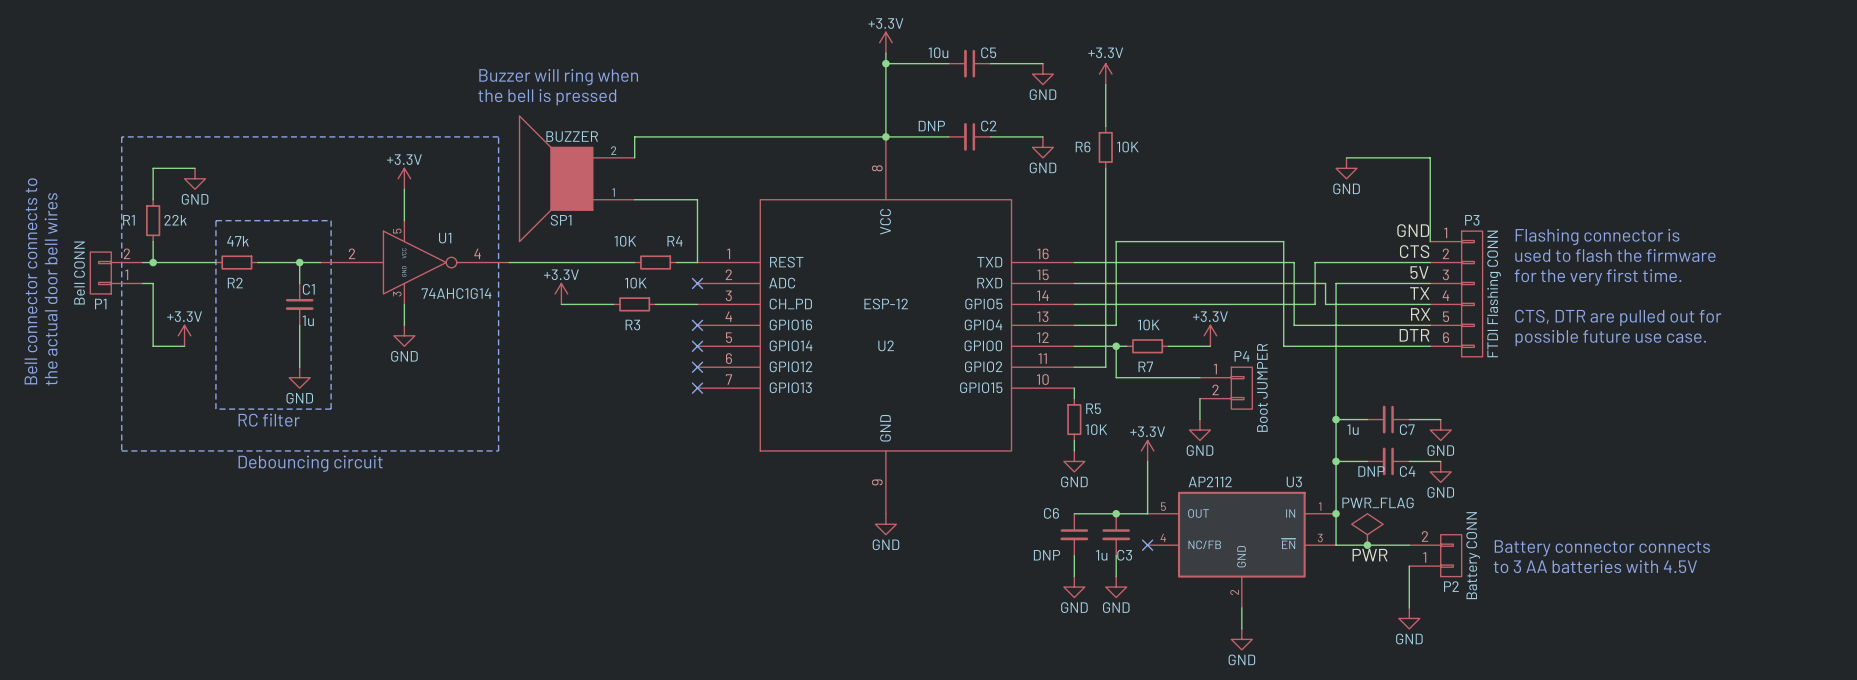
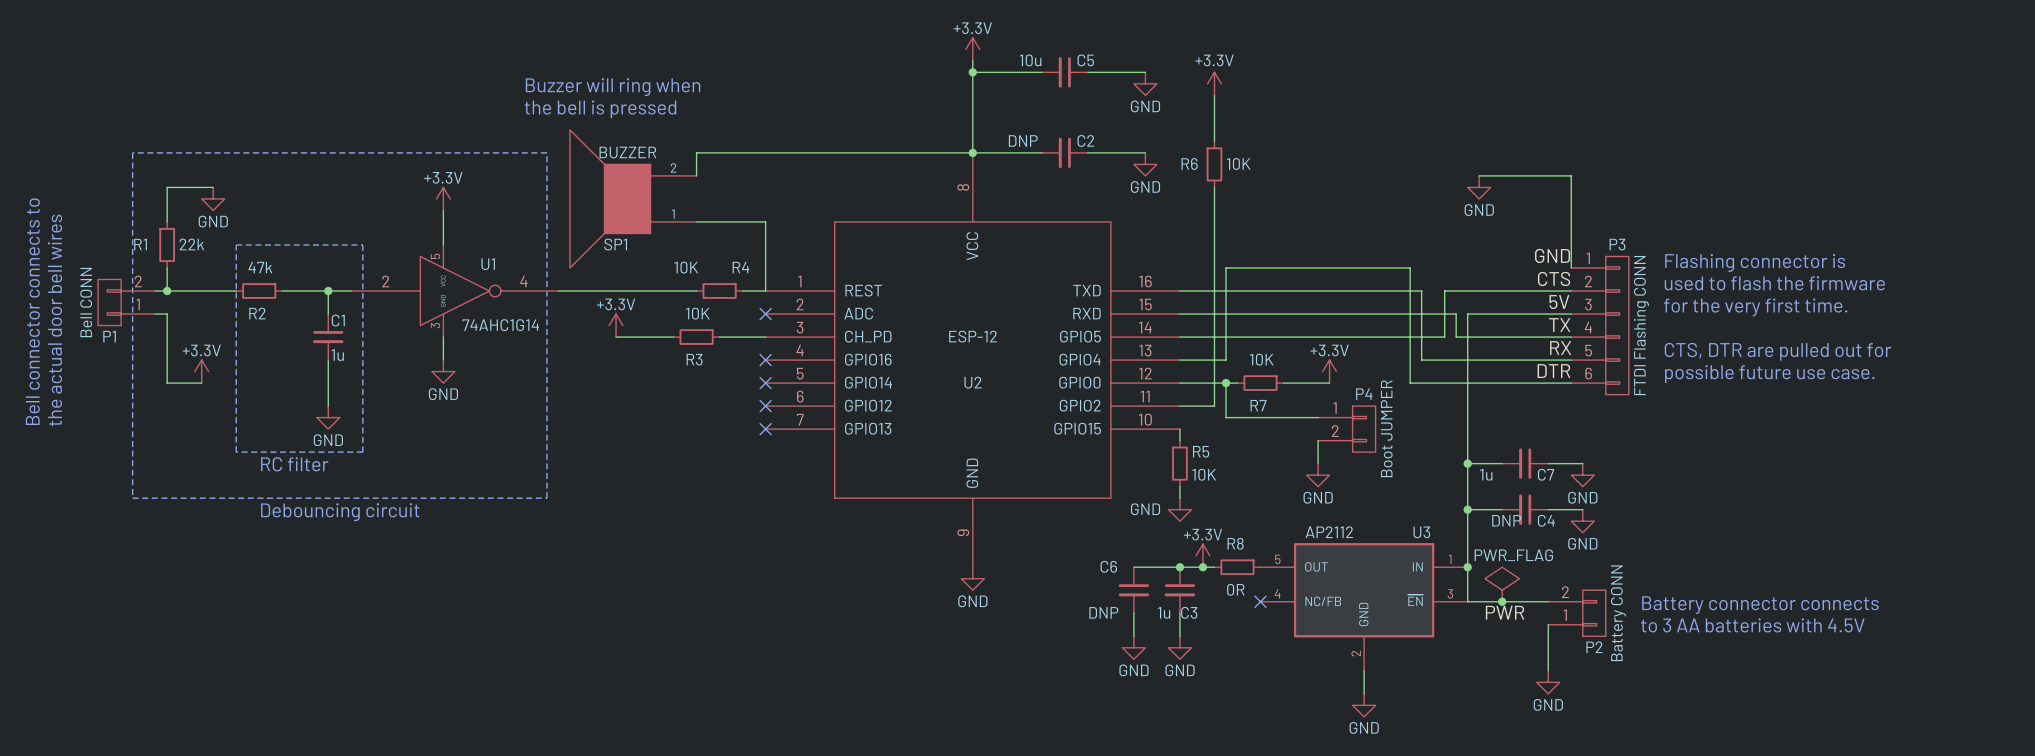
power symbol position: +3.3V (1147, 450) -> +3.3V (1202, 555)
wire: (1147, 461) (1147, 513) (1105, 513) -> none
power symbol text position: GND (1074, 481) -> GND (1145, 509)
wire: none -> (1133, 567) (1179, 567)
C6 name: C6 (1051, 513) -> C3 (1189, 612)
junction: none -> (1179, 567)
junction: none -> (1202, 567)
junction: (1116, 513) -> none
R8: none -> 0R (1237, 567)
C6: none -> DNP (1133, 590)
C3: 1u (1116, 534) -> none
C6 value: DNP (1046, 555) -> 1u (1164, 612)
wire: (1116, 555) (1116, 576) -> (1133, 613) (1133, 636)
power symbol position: GND (1116, 587) -> GND (1133, 647)

